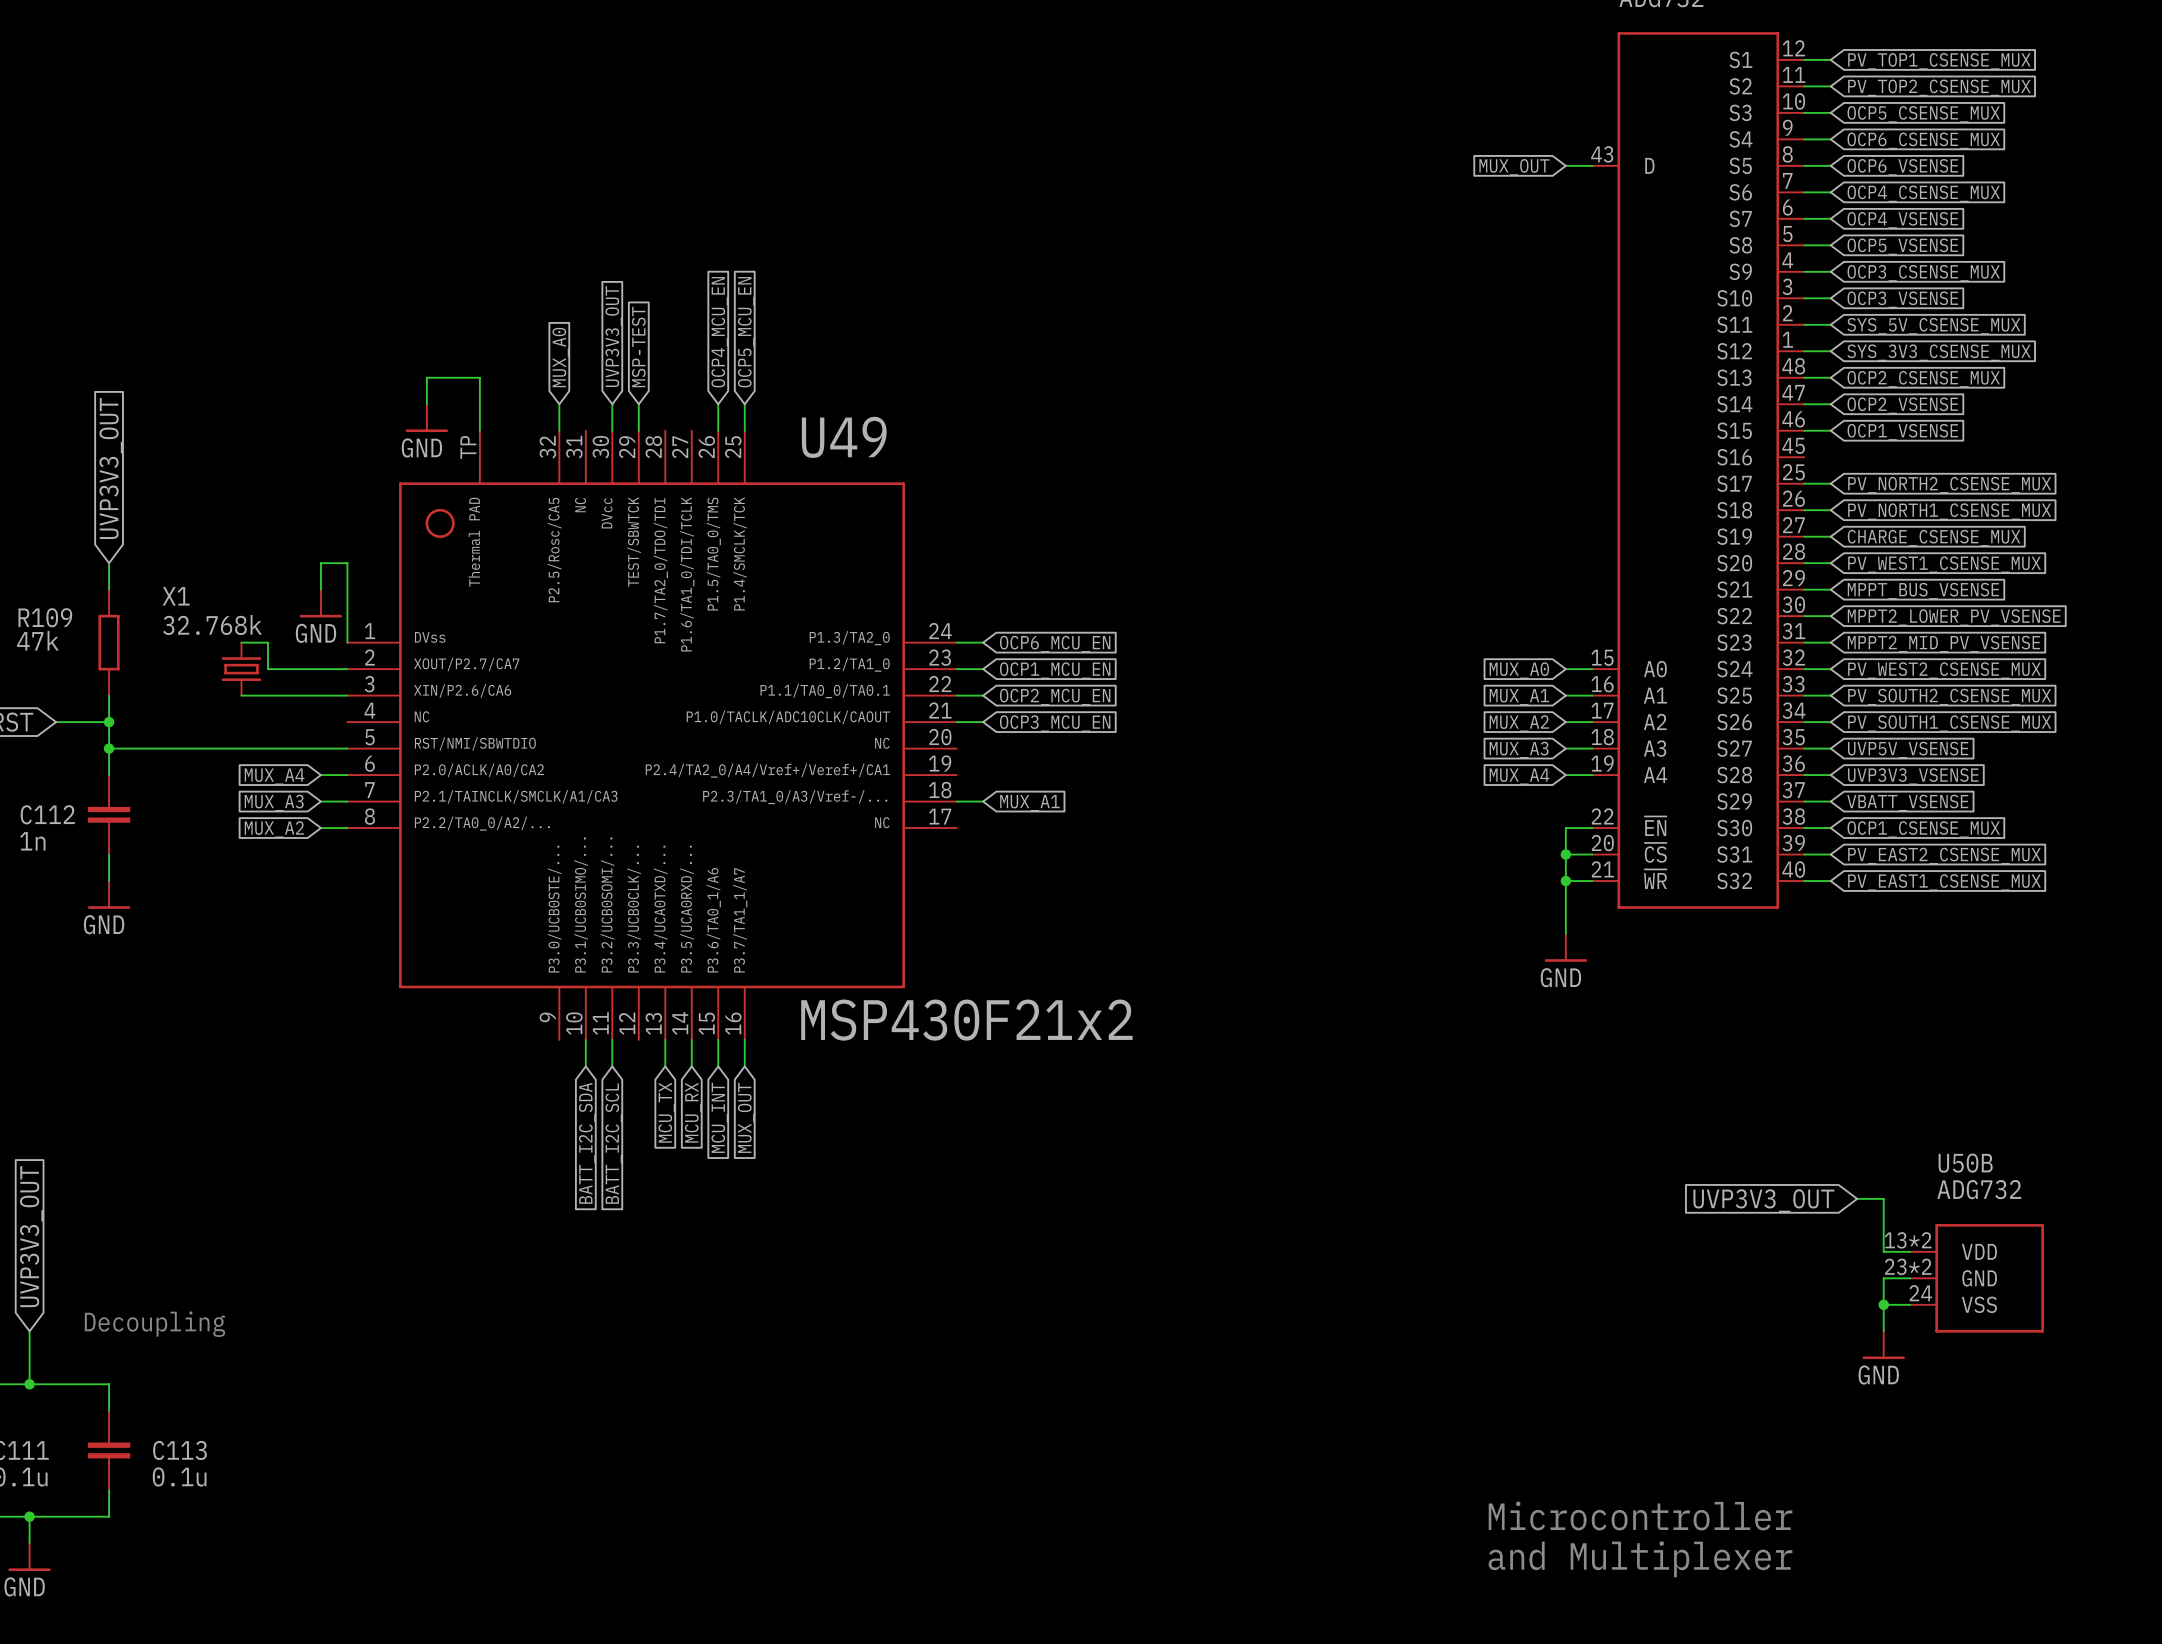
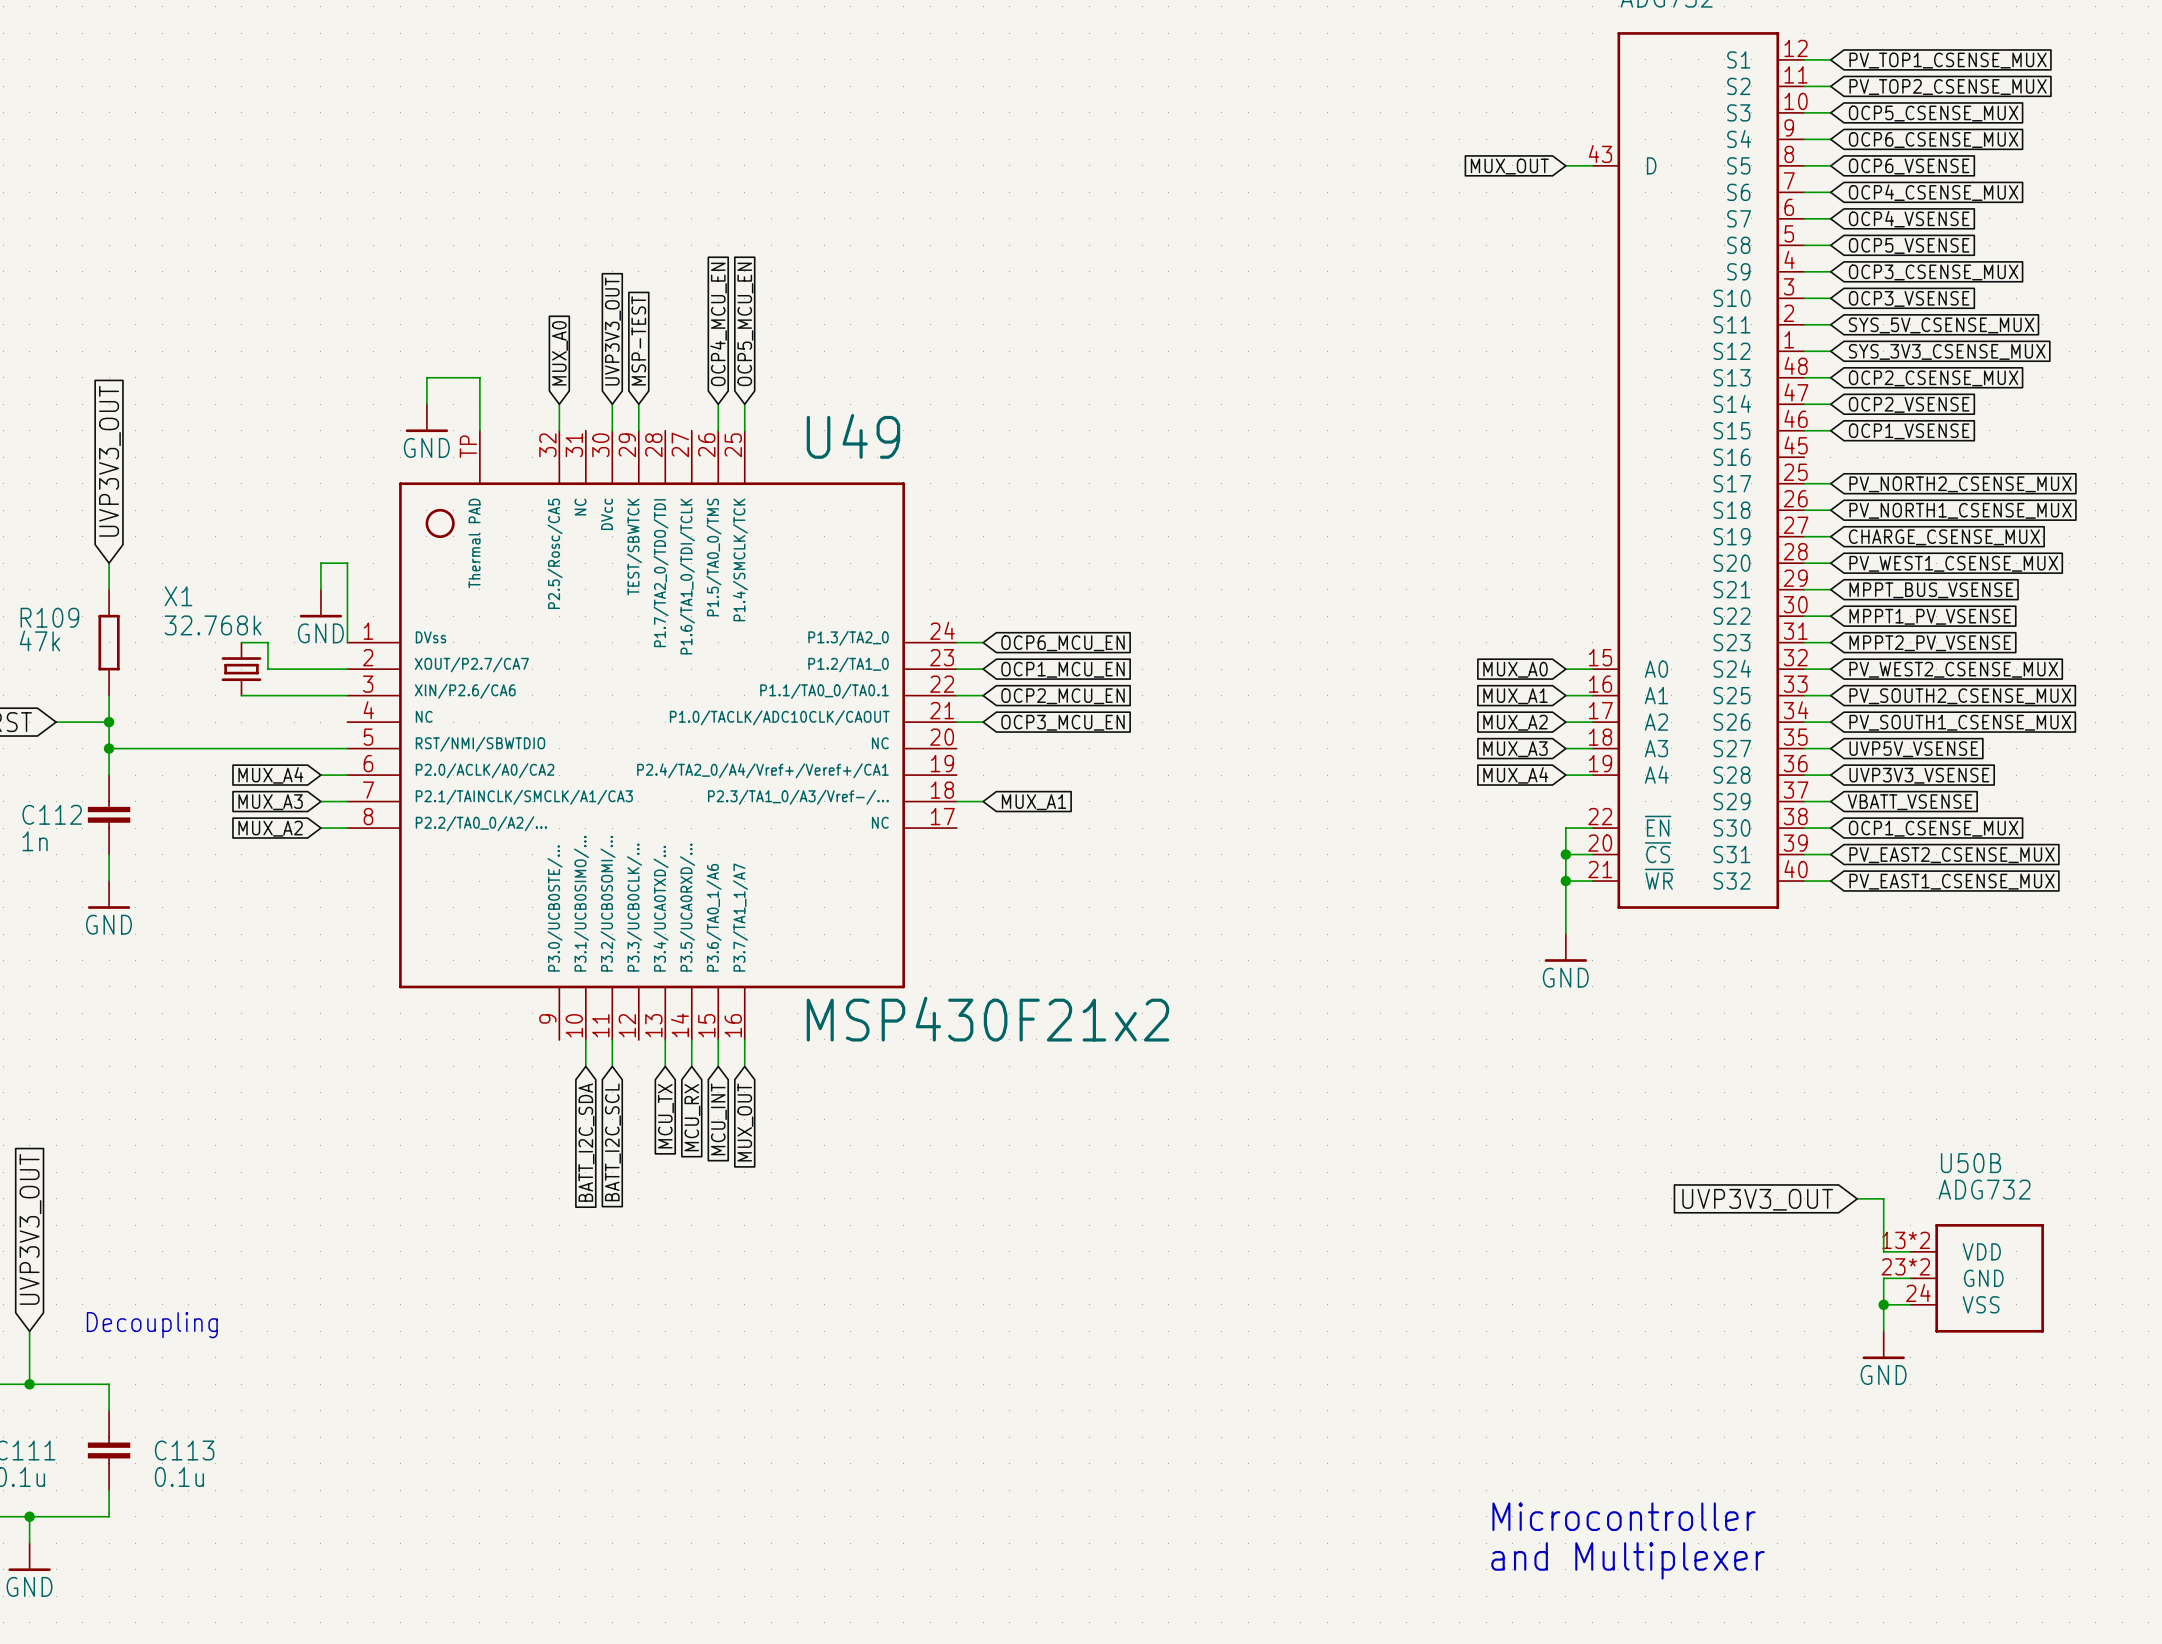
global label: MPPT2_LOWER_PV_VSENSE (1954, 617) -> MPPT1_PV_VSENSE (1930, 616)
global label: MPPT2_MID_PV_VSENSE (1943, 644) -> MPPT2_PV_VSENSE (1930, 643)

